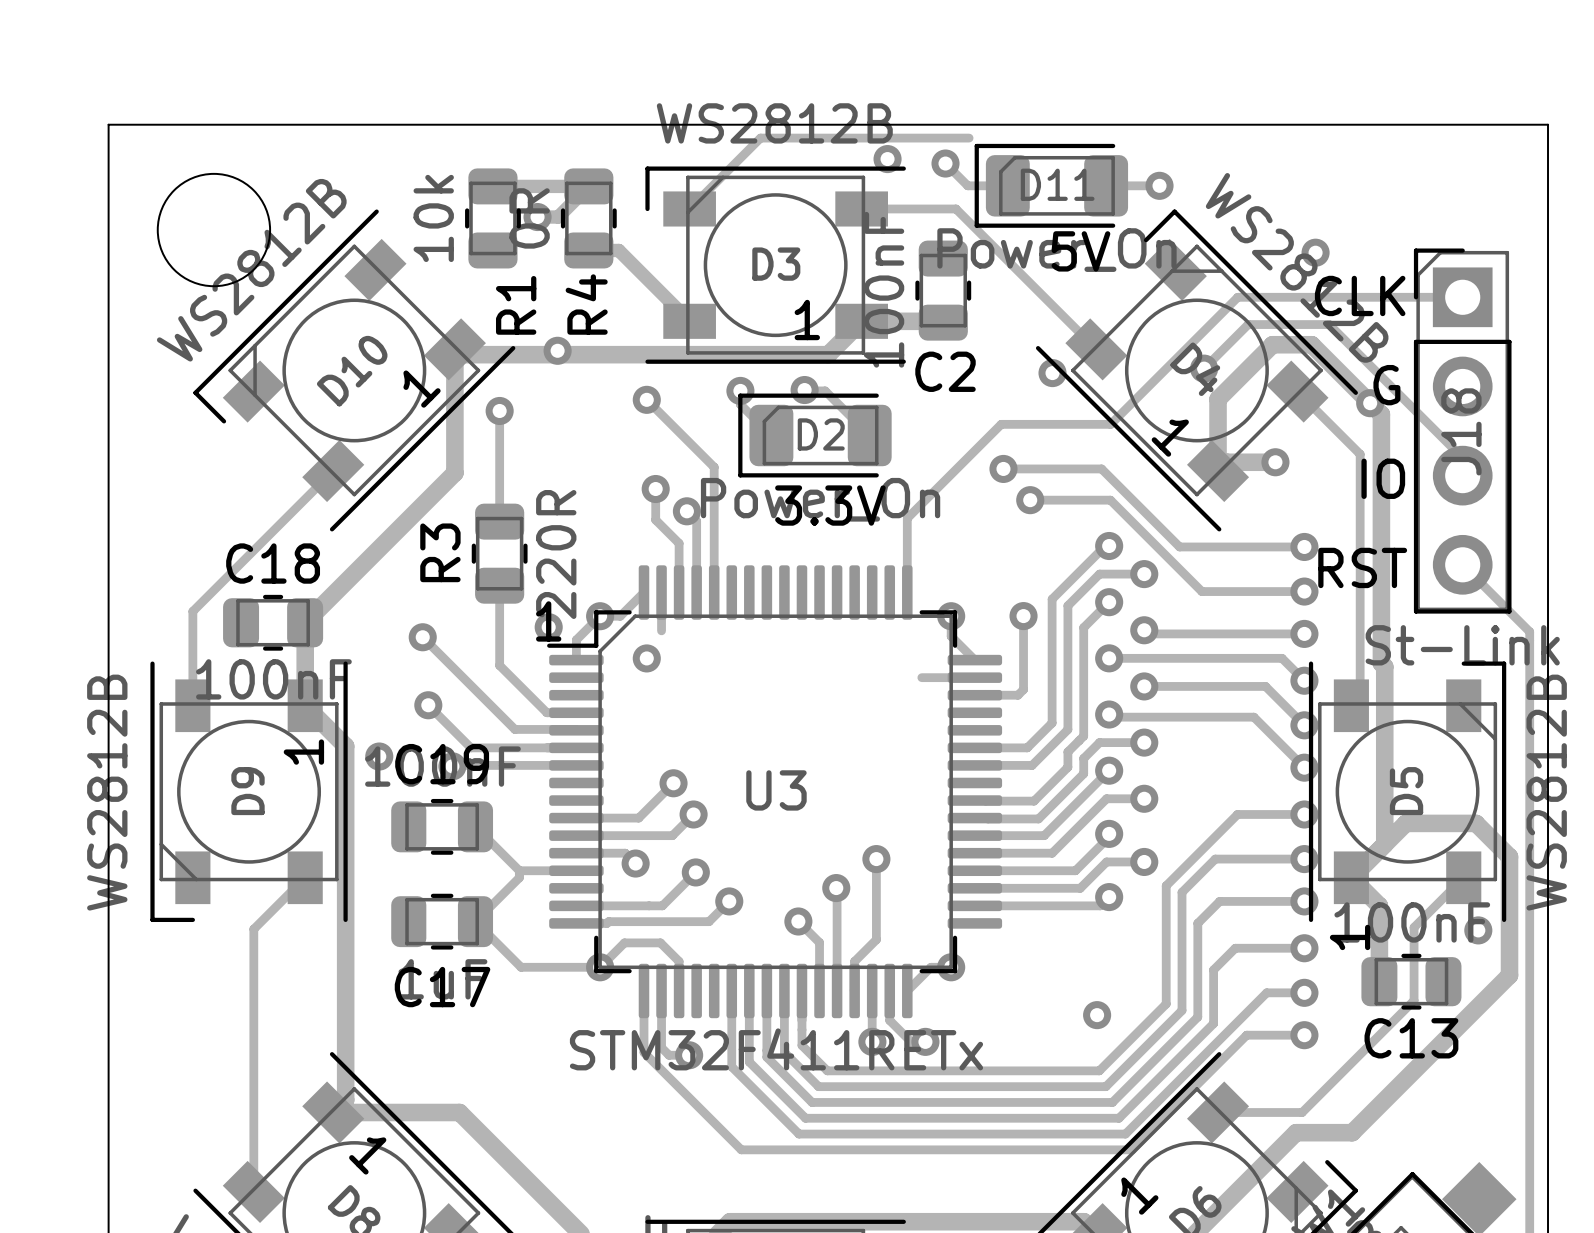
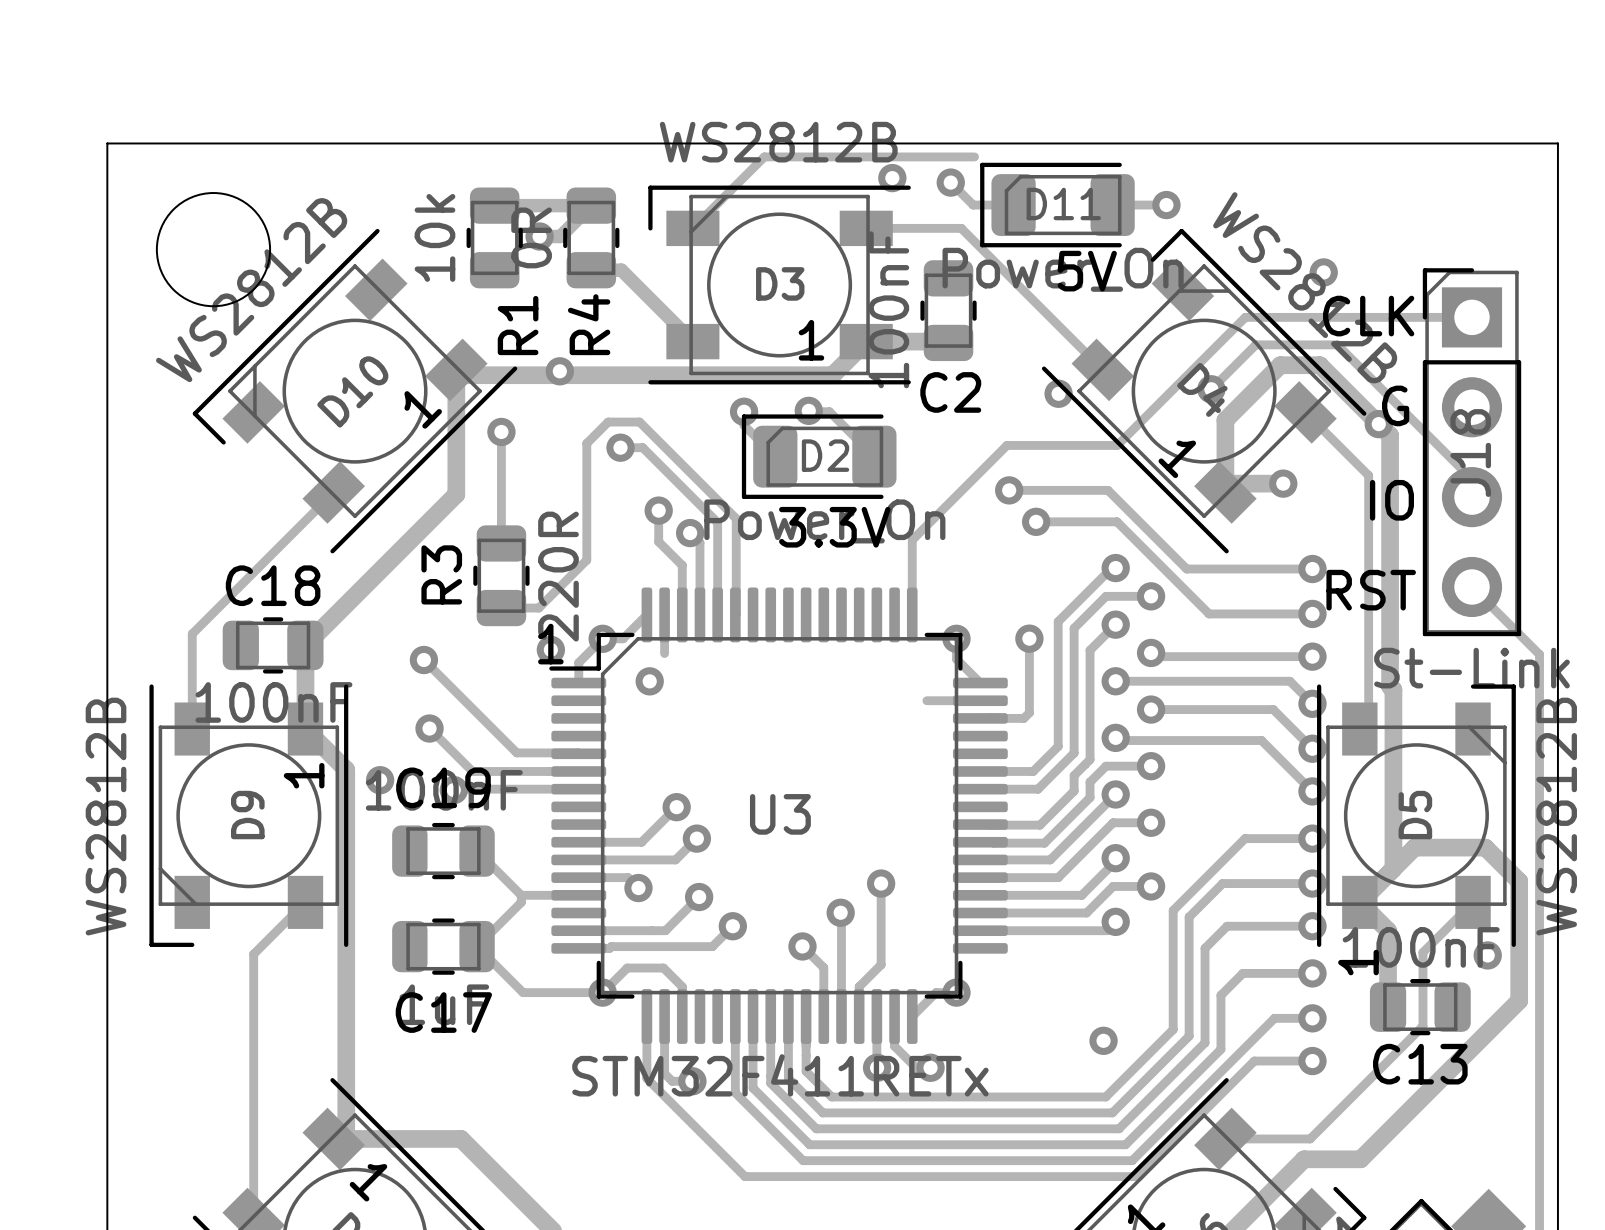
track: (646, 399) (714, 467) (714, 500) -> (620, 447) (642, 447) (717, 522)
via position: (646, 399) -> (620, 447)
track: (499, 585) (499, 665) (546, 712) (576, 712) -> (501, 608) (538, 608) (586, 560) (586, 443) (608, 422) (639, 422) (736, 518) (735, 614)

